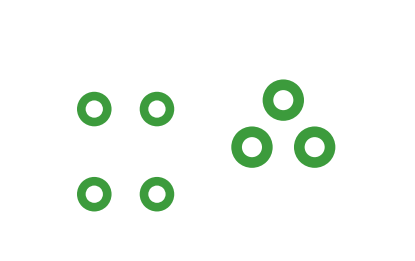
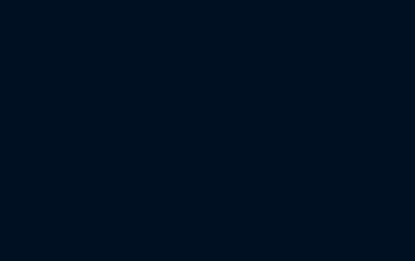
part: (125, 109) -> none
part: (283, 123) -> none
part: (125, 194) -> none

